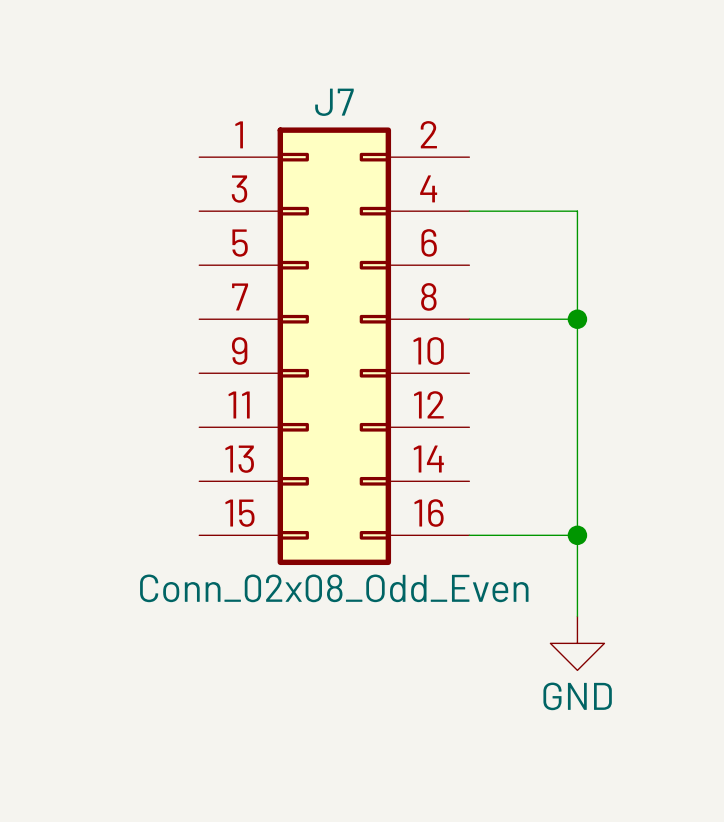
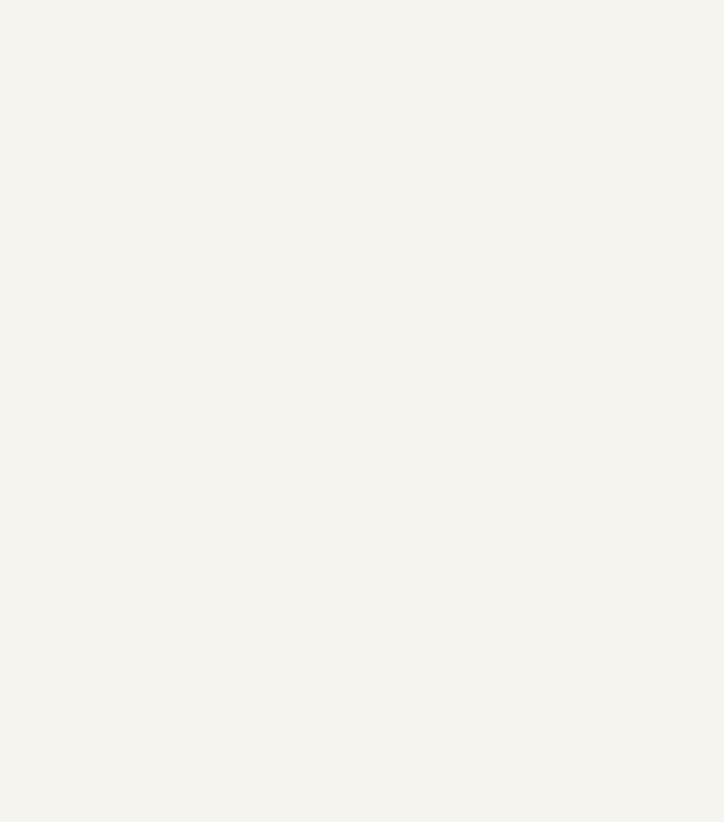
wire: (469, 211) (577, 211) (577, 616) -> none
wire: (469, 319) (577, 319) -> none
junction: (577, 319) -> none
J7: Conn_02x08_Odd_Even (334, 346) -> none
wire: (469, 535) (577, 535) -> none
junction: (577, 535) -> none
power symbol: GND (577, 643) -> none

